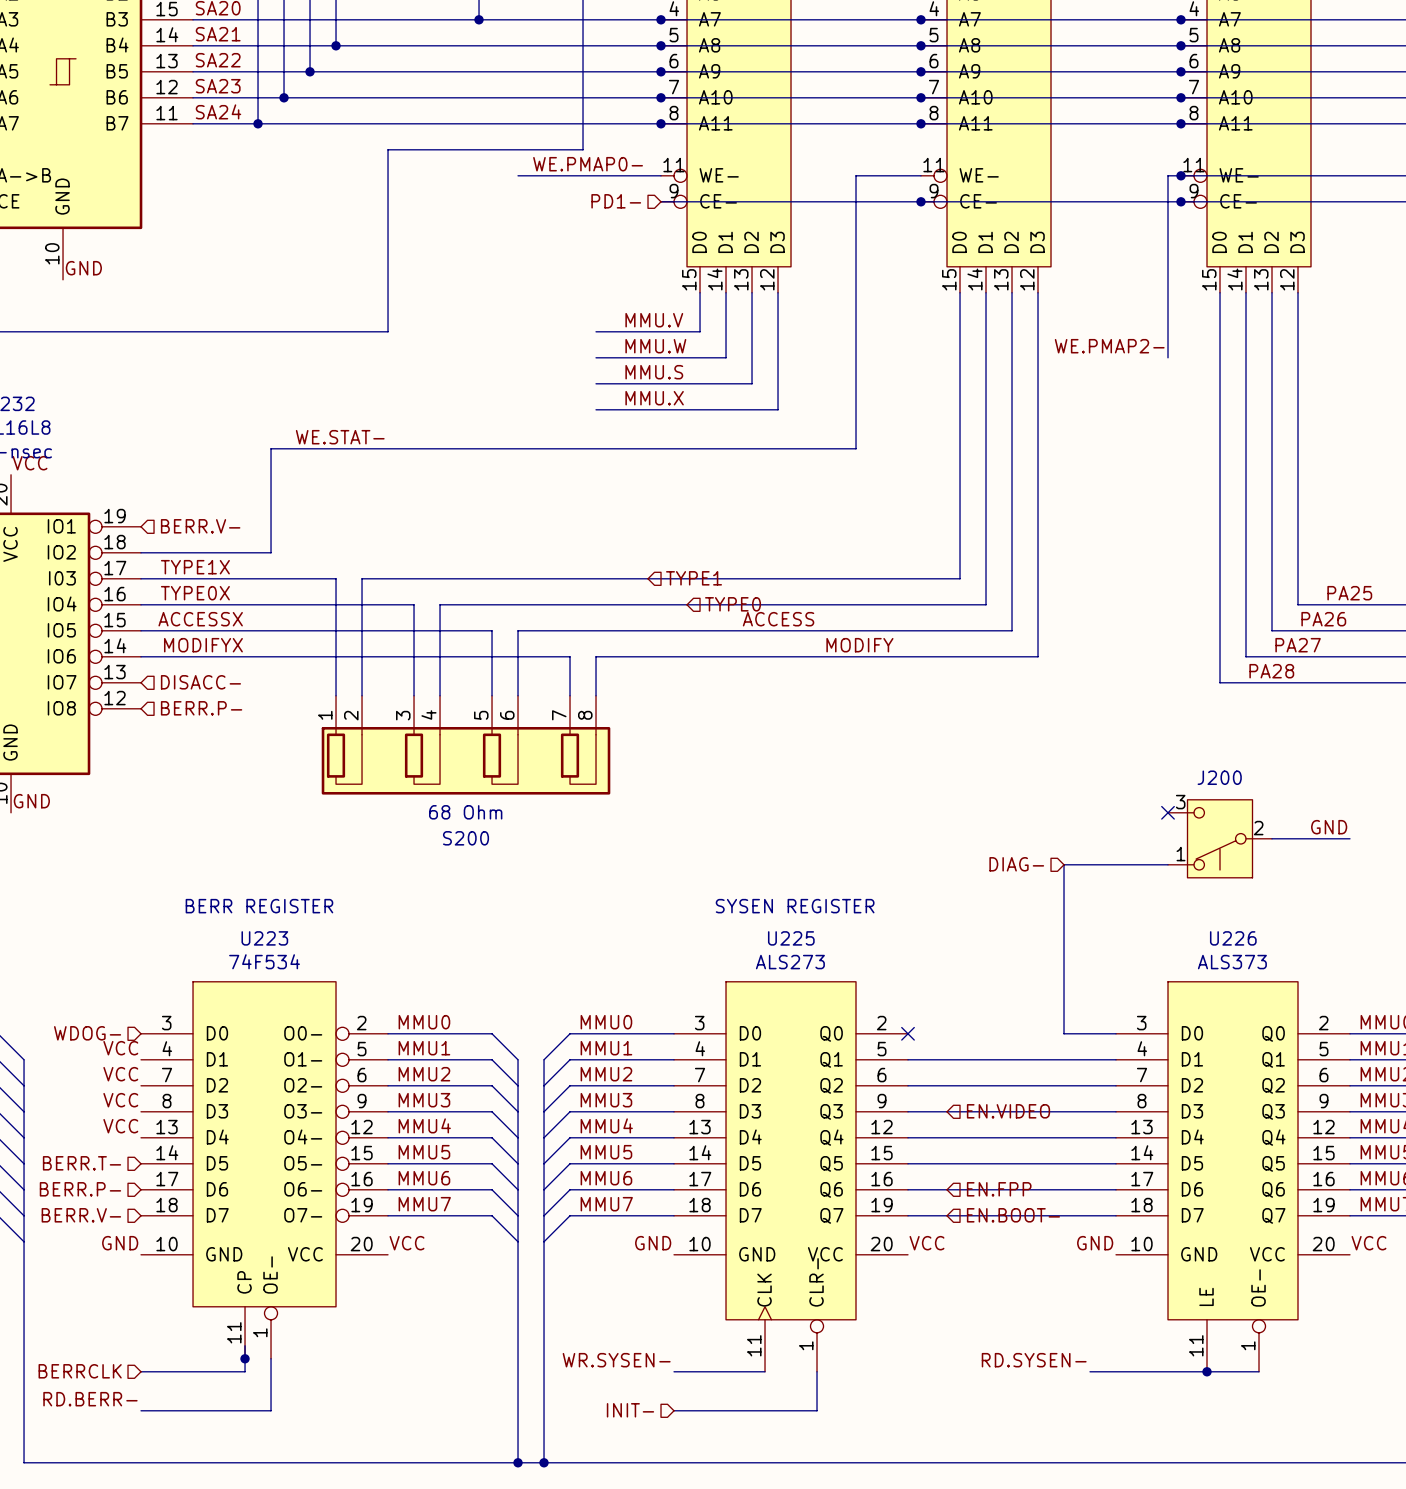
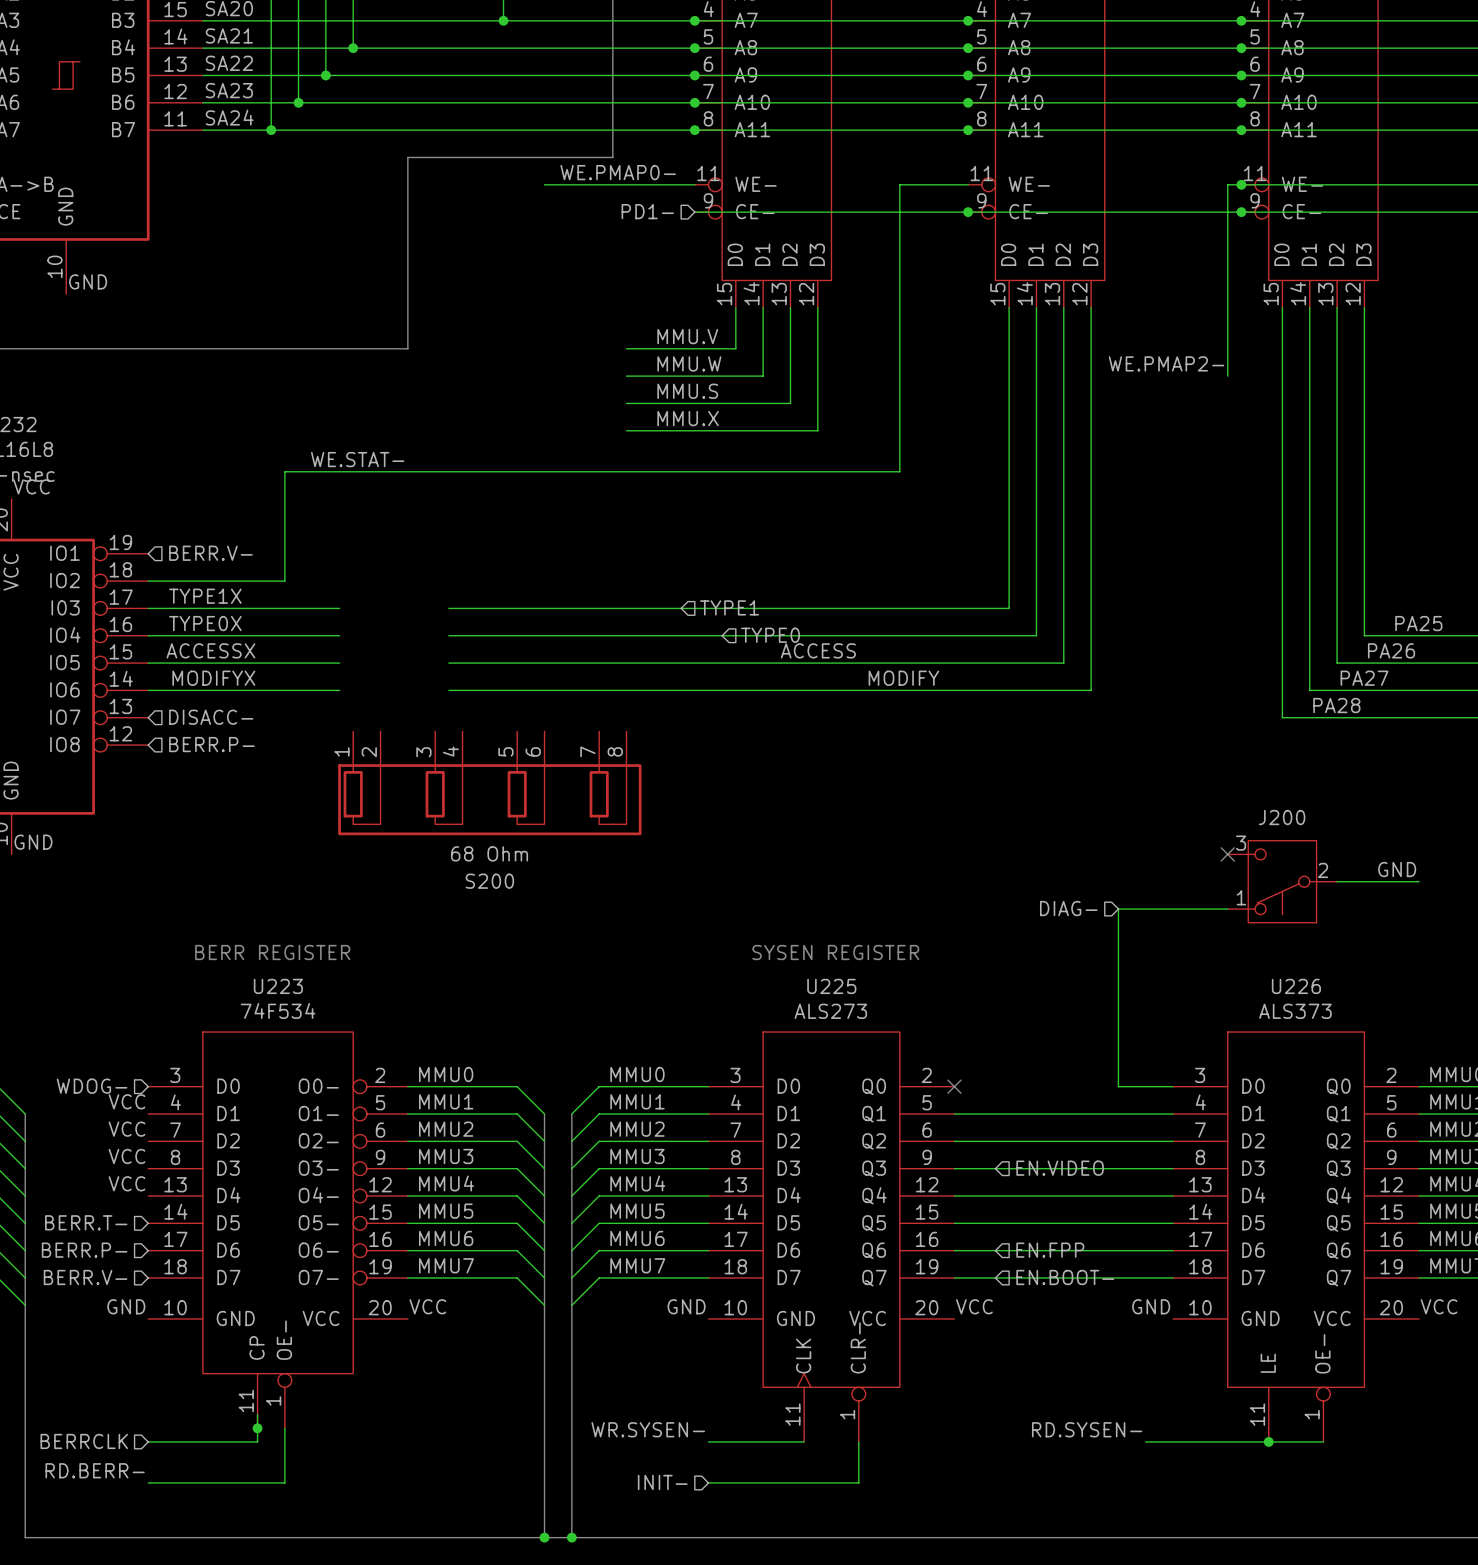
wire: (323, 578) (336, 578) (336, 695) -> none
wire: (427, 578) (362, 578) (362, 695) -> none
wire: (323, 604) (414, 604) (414, 695) -> none
wire: (440, 604) (440, 695) -> (462, 635) (448, 635)
wire: (323, 630) (427, 630) -> none
wire: (492, 630) (492, 695) -> (517, 663) (544, 663)
wire: (518, 630) (518, 695) -> none
wire: (323, 656) (427, 656) -> none
wire: (570, 656) (570, 695) -> (599, 690) (626, 690)
wire: (596, 656) (596, 695) -> none

